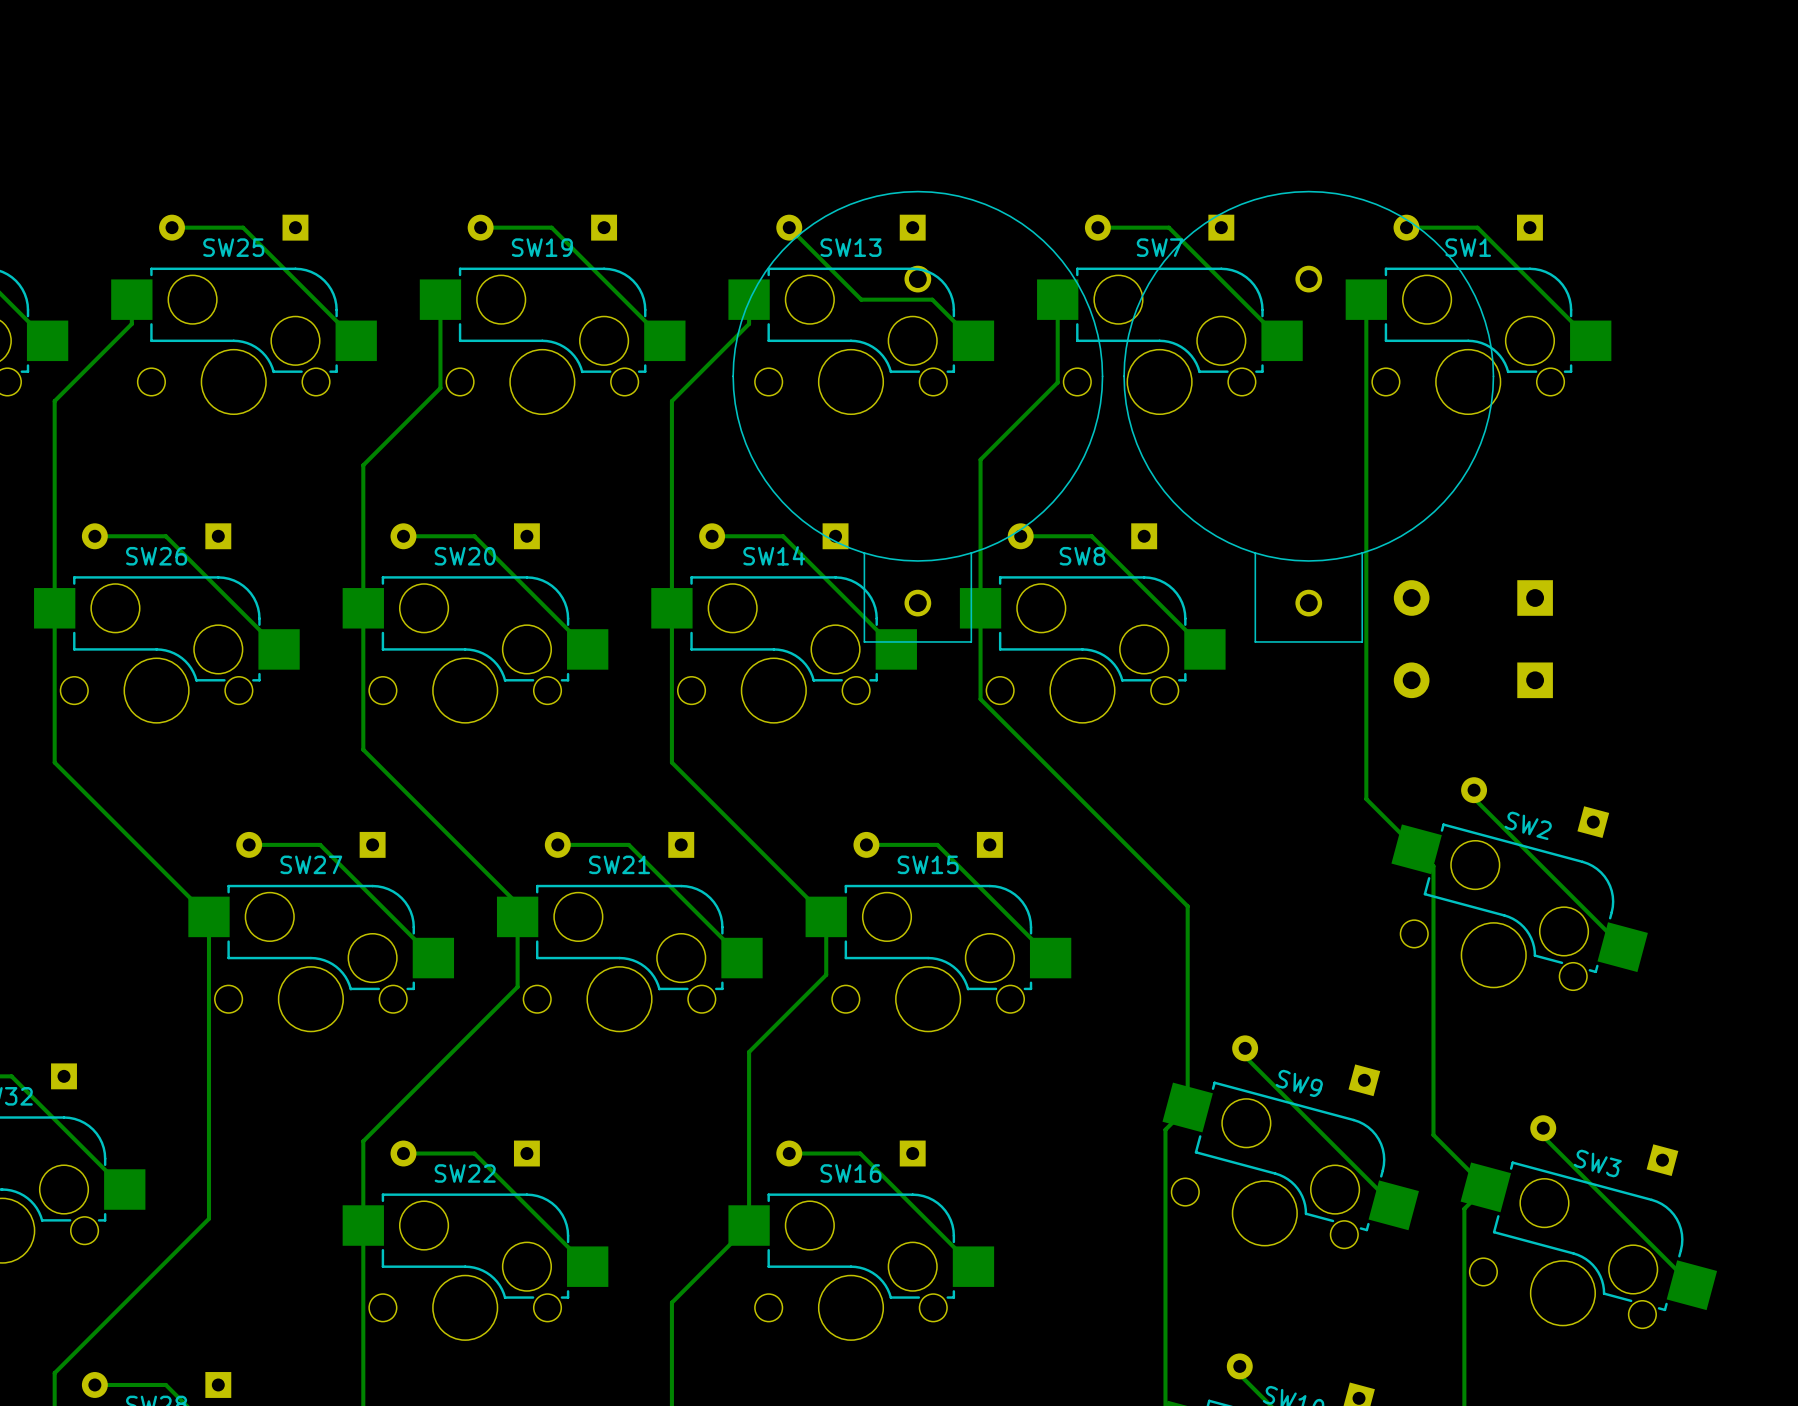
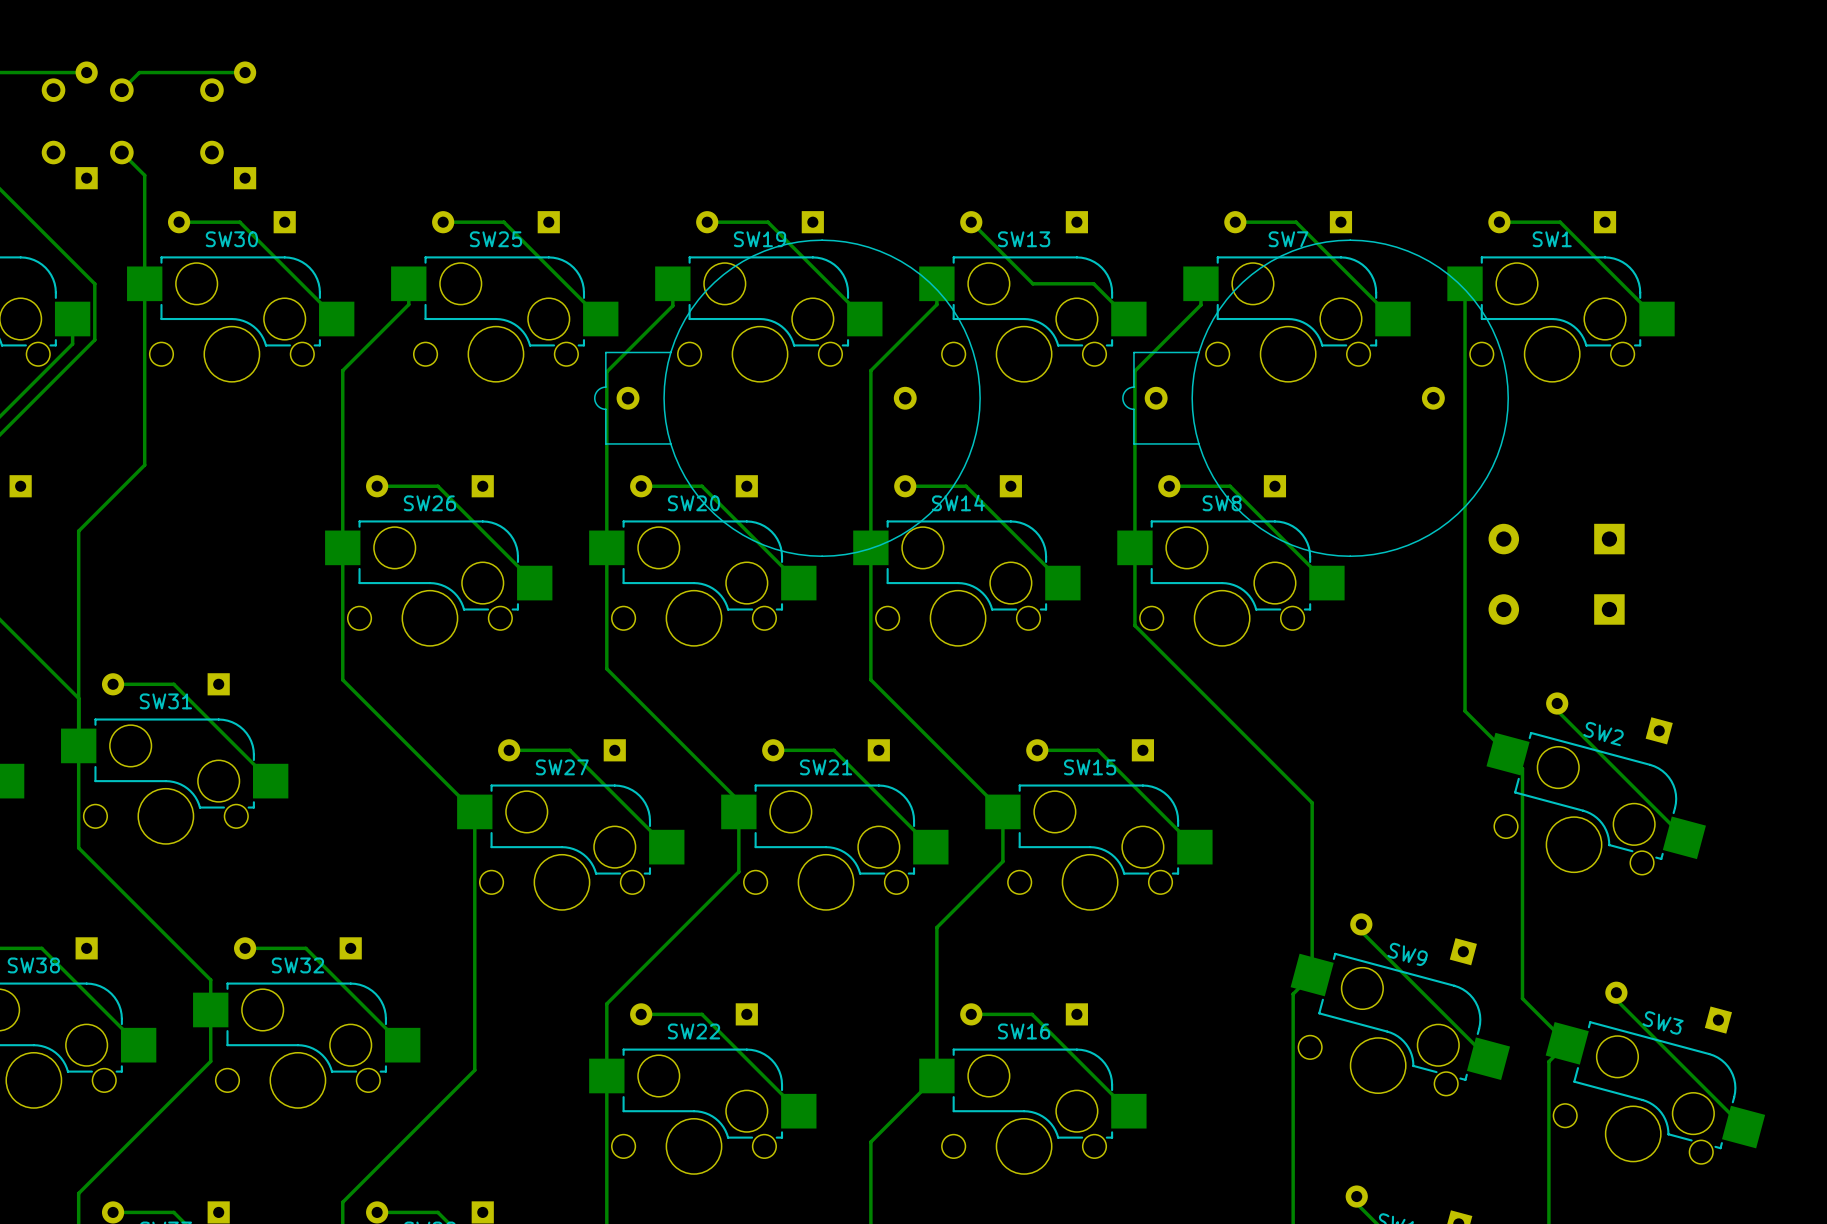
track: (1057, 324) (1057, 382) (980, 459) -> (1200, 304) (1134, 370) (1134, 420)
track: (440, 325) (440, 388) (363, 465) -> (672, 305) (606, 371) (606, 425)
part: (917, 416) -> none
part: (1308, 416) -> none
part: none -> (787, 398)
part: none -> (1315, 398)

